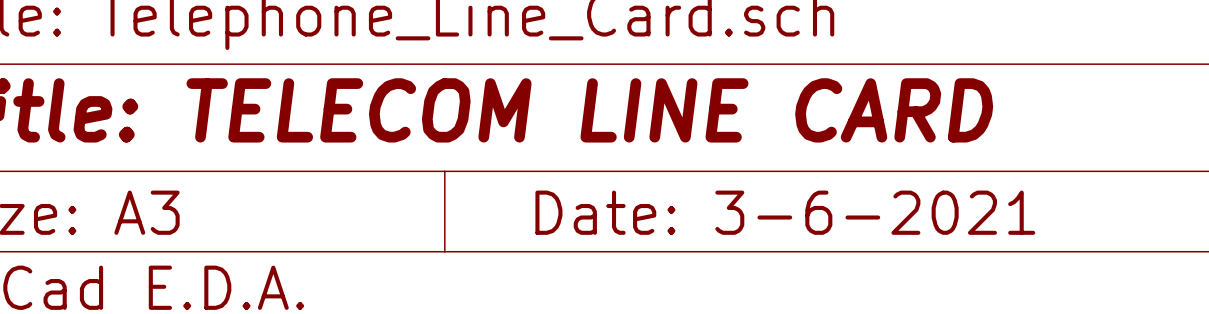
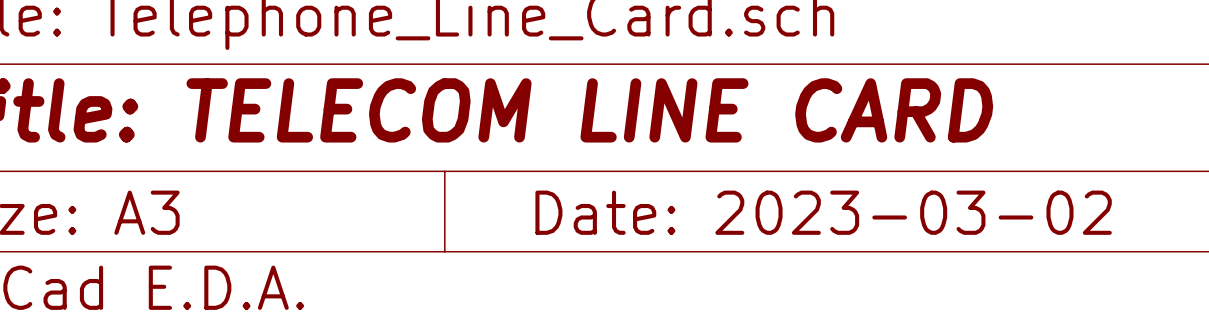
title block: Date: 3-6-2021 (785, 212) -> Date: 2023-03-02 (823, 212)

